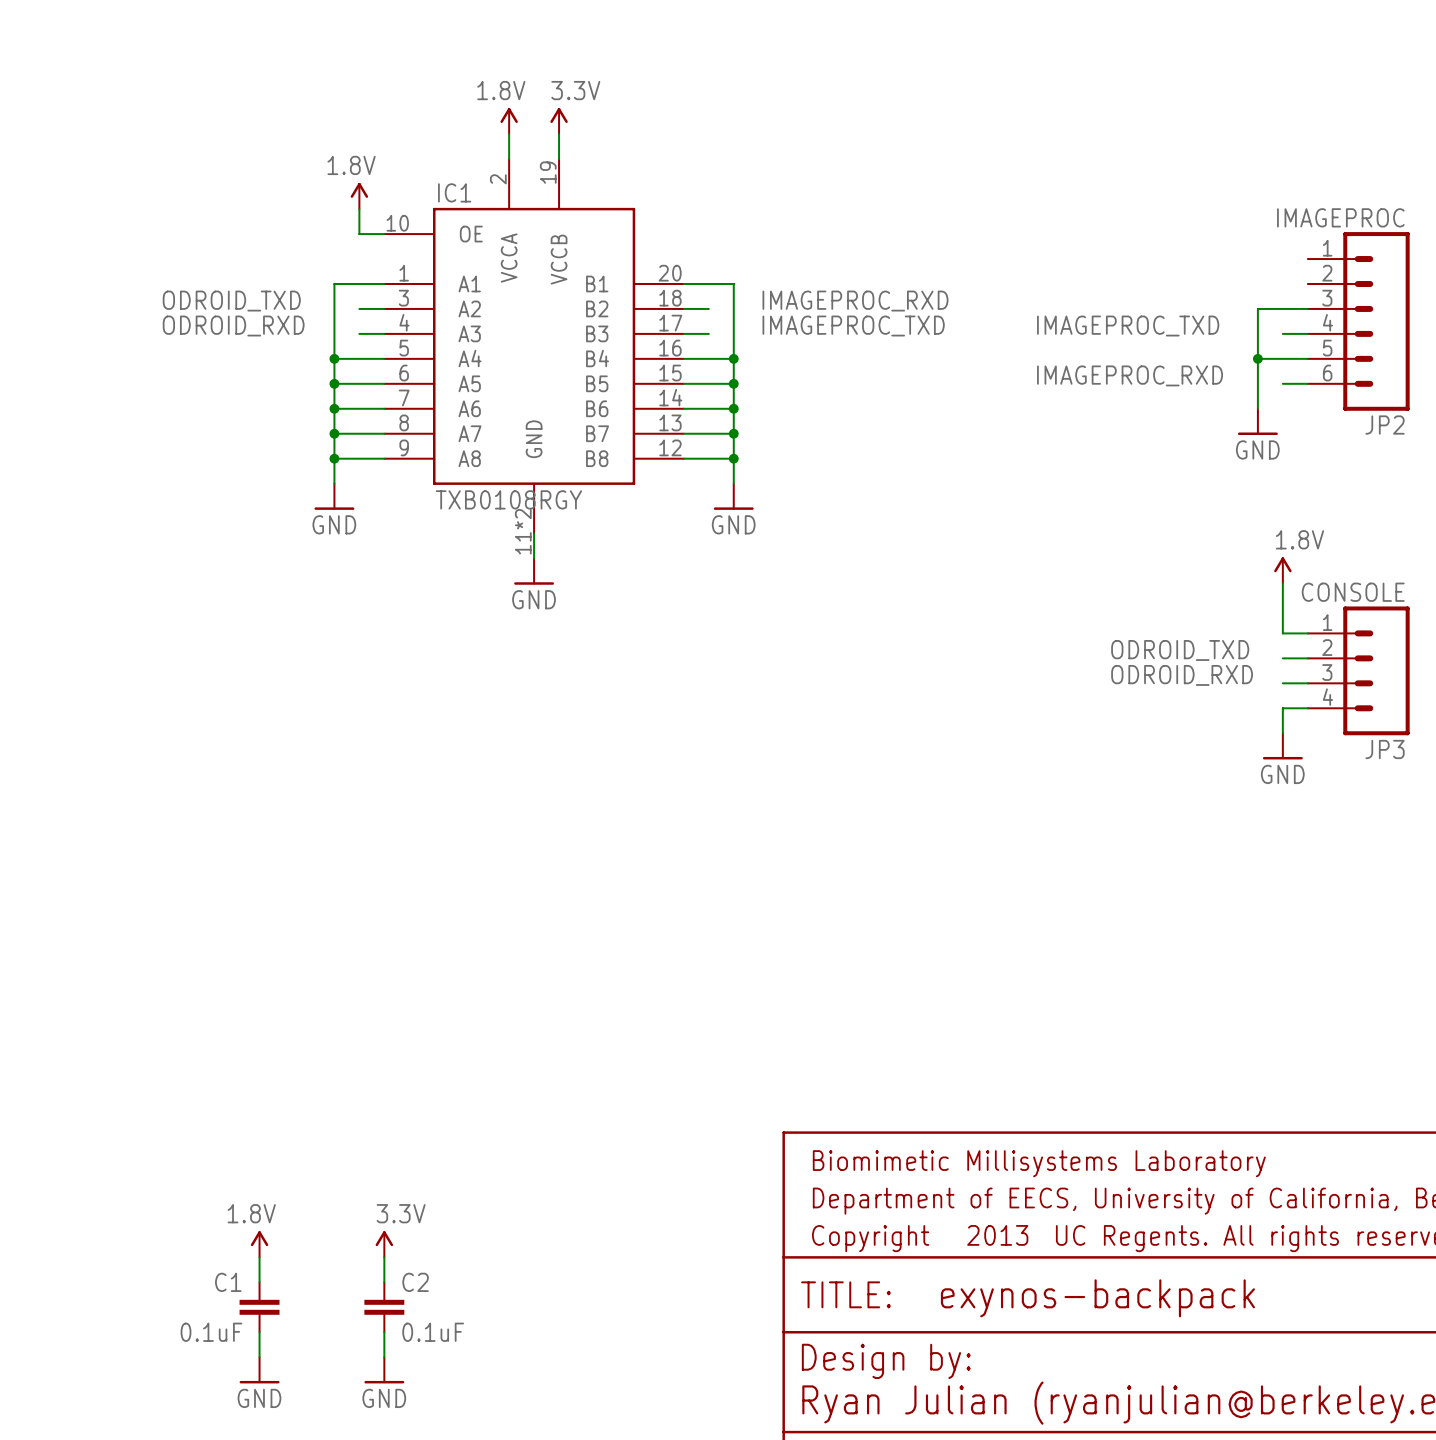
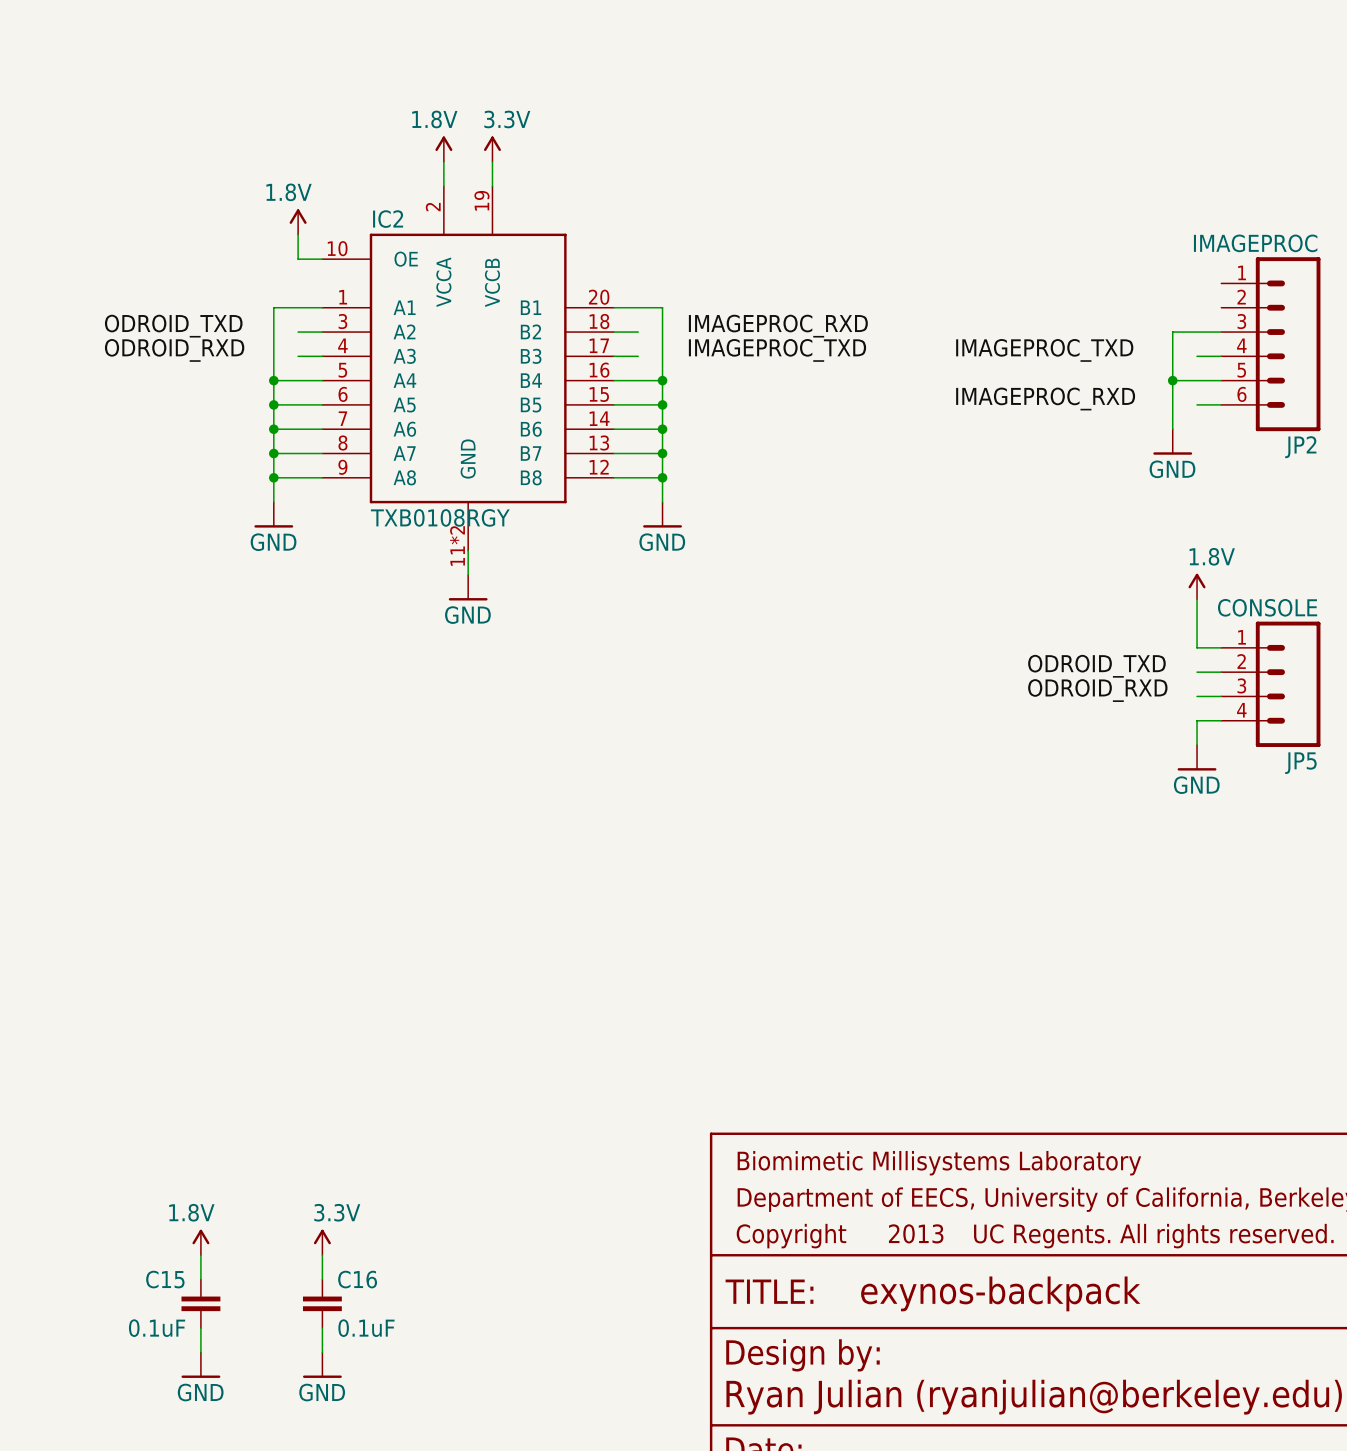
IC1 name: IC1 (454, 192) -> IC2 (388, 219)
JP3 name: JP3 (1385, 749) -> JP5 (1300, 763)
C1 name: C1 (228, 1282) -> C15 (165, 1279)
C2 name: C2 (415, 1282) -> C16 (357, 1279)

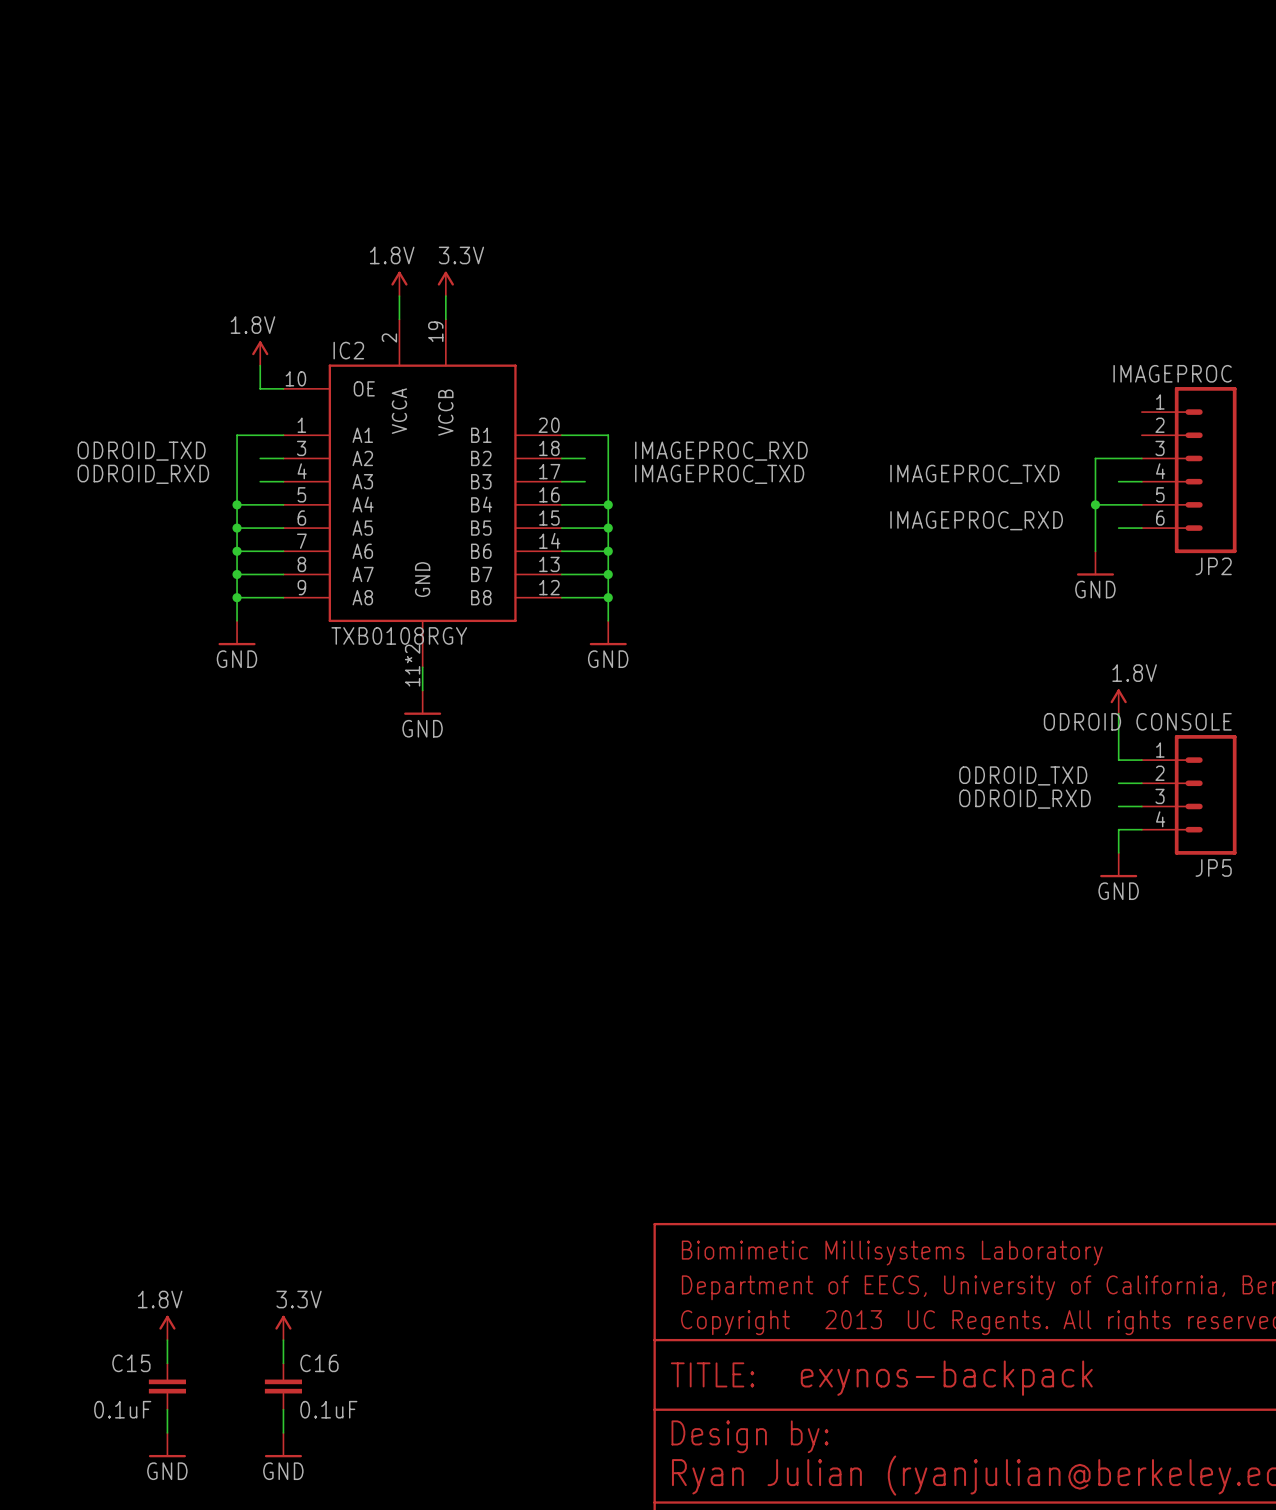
JP5 value: CONSOLE (1267, 607) -> ODROID CONSOLE (1137, 721)

